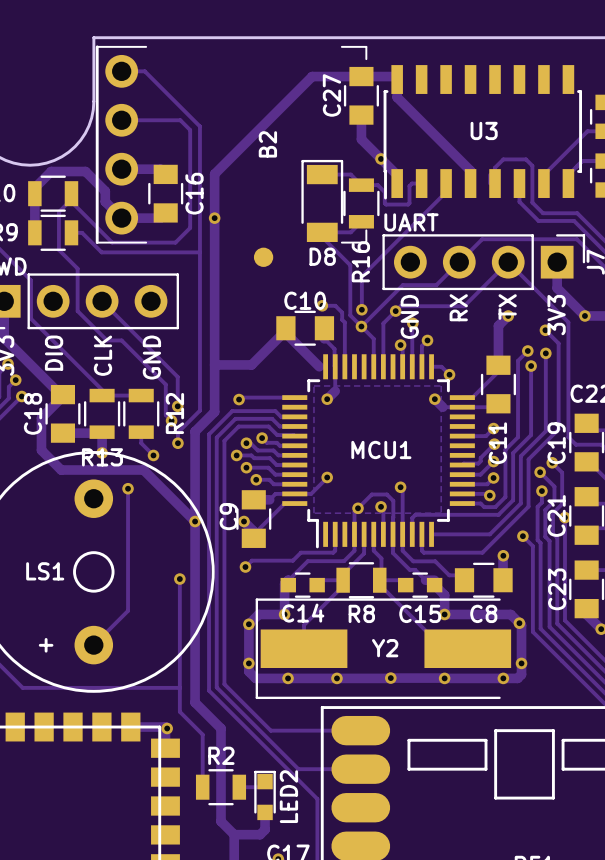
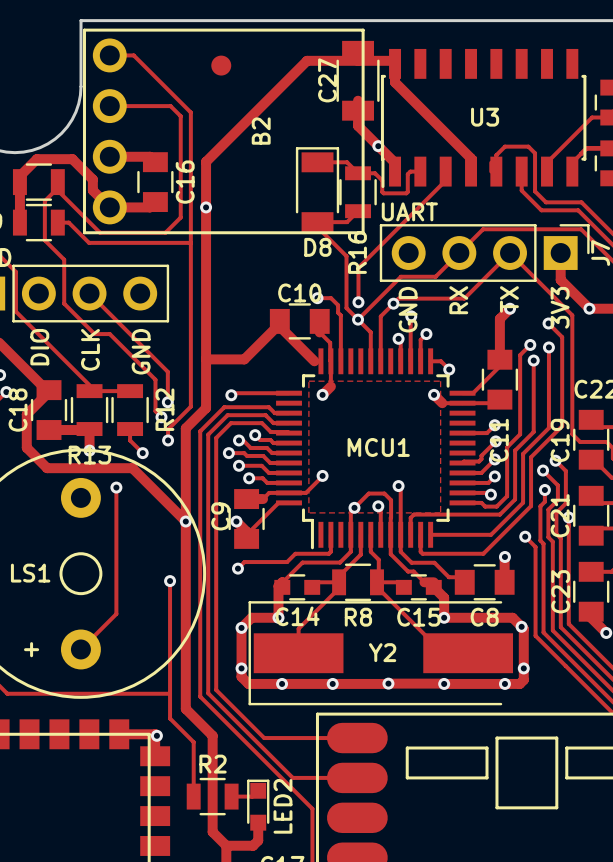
B2 footprint: [95, 45, 368, 245] -> [82, 28, 365, 235]
C27 footprint: [343, 66, 379, 125] -> [336, 40, 380, 121]
part position: (263, 257) -> (221, 65)

